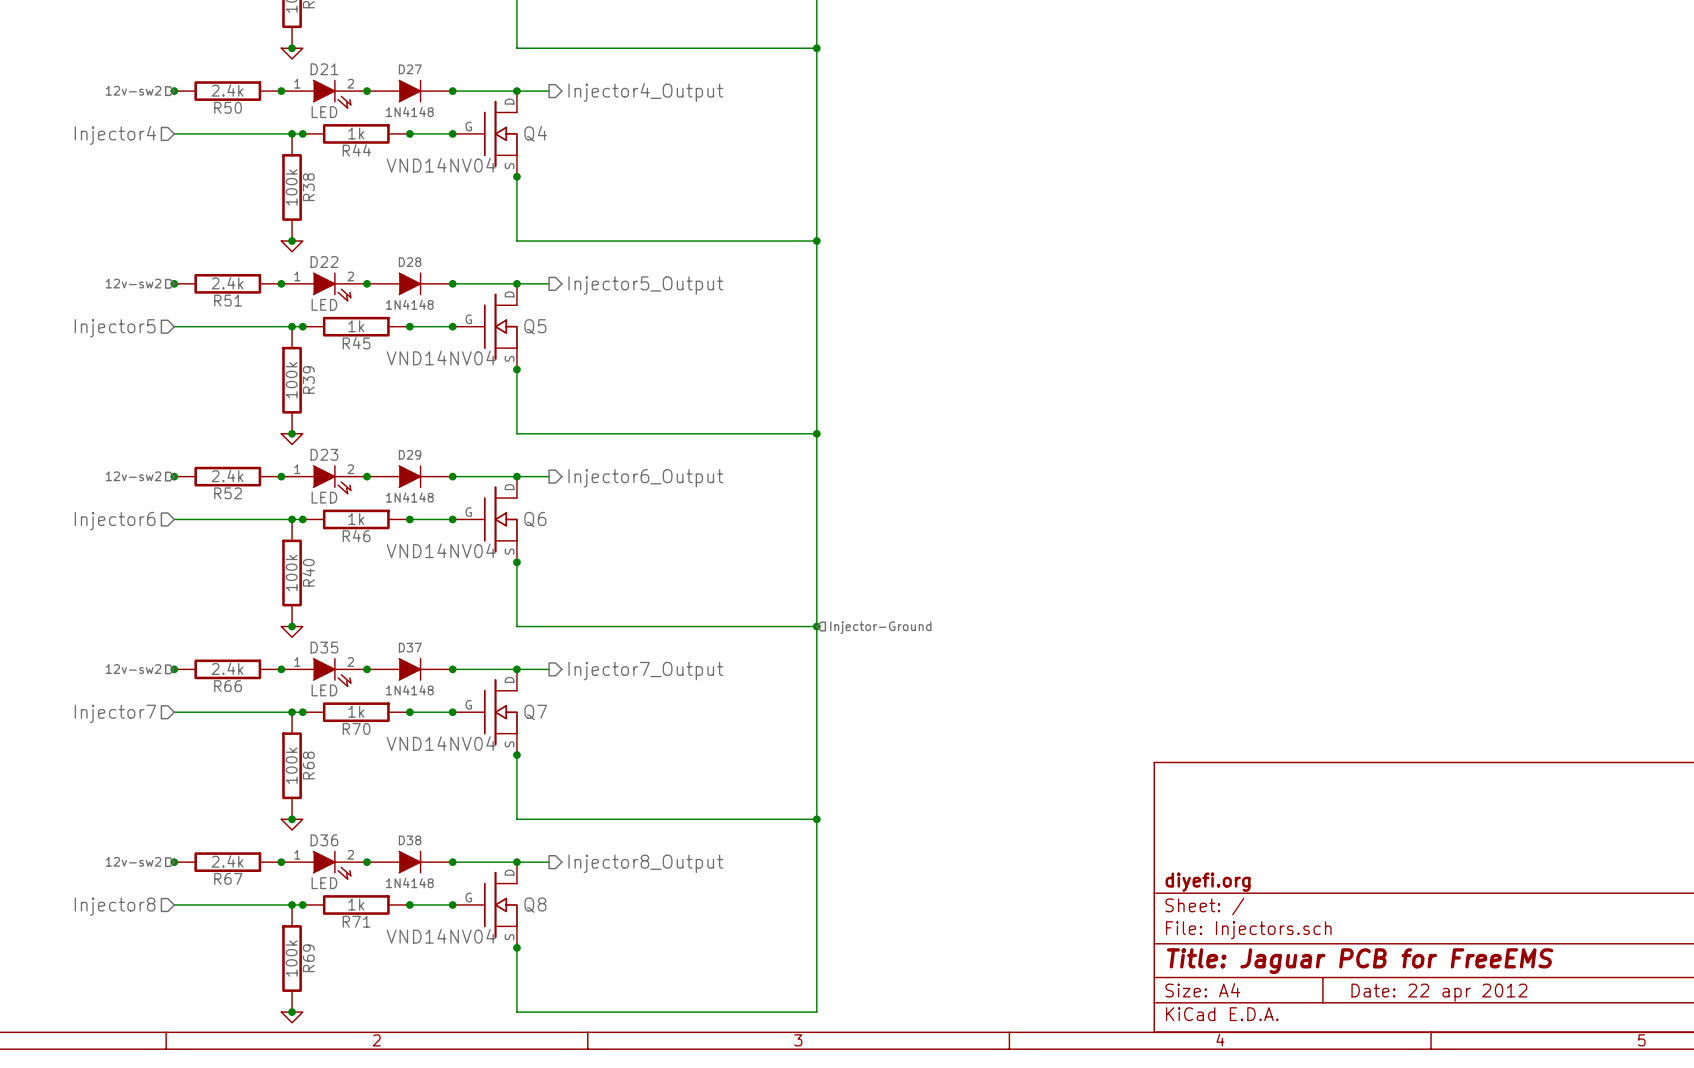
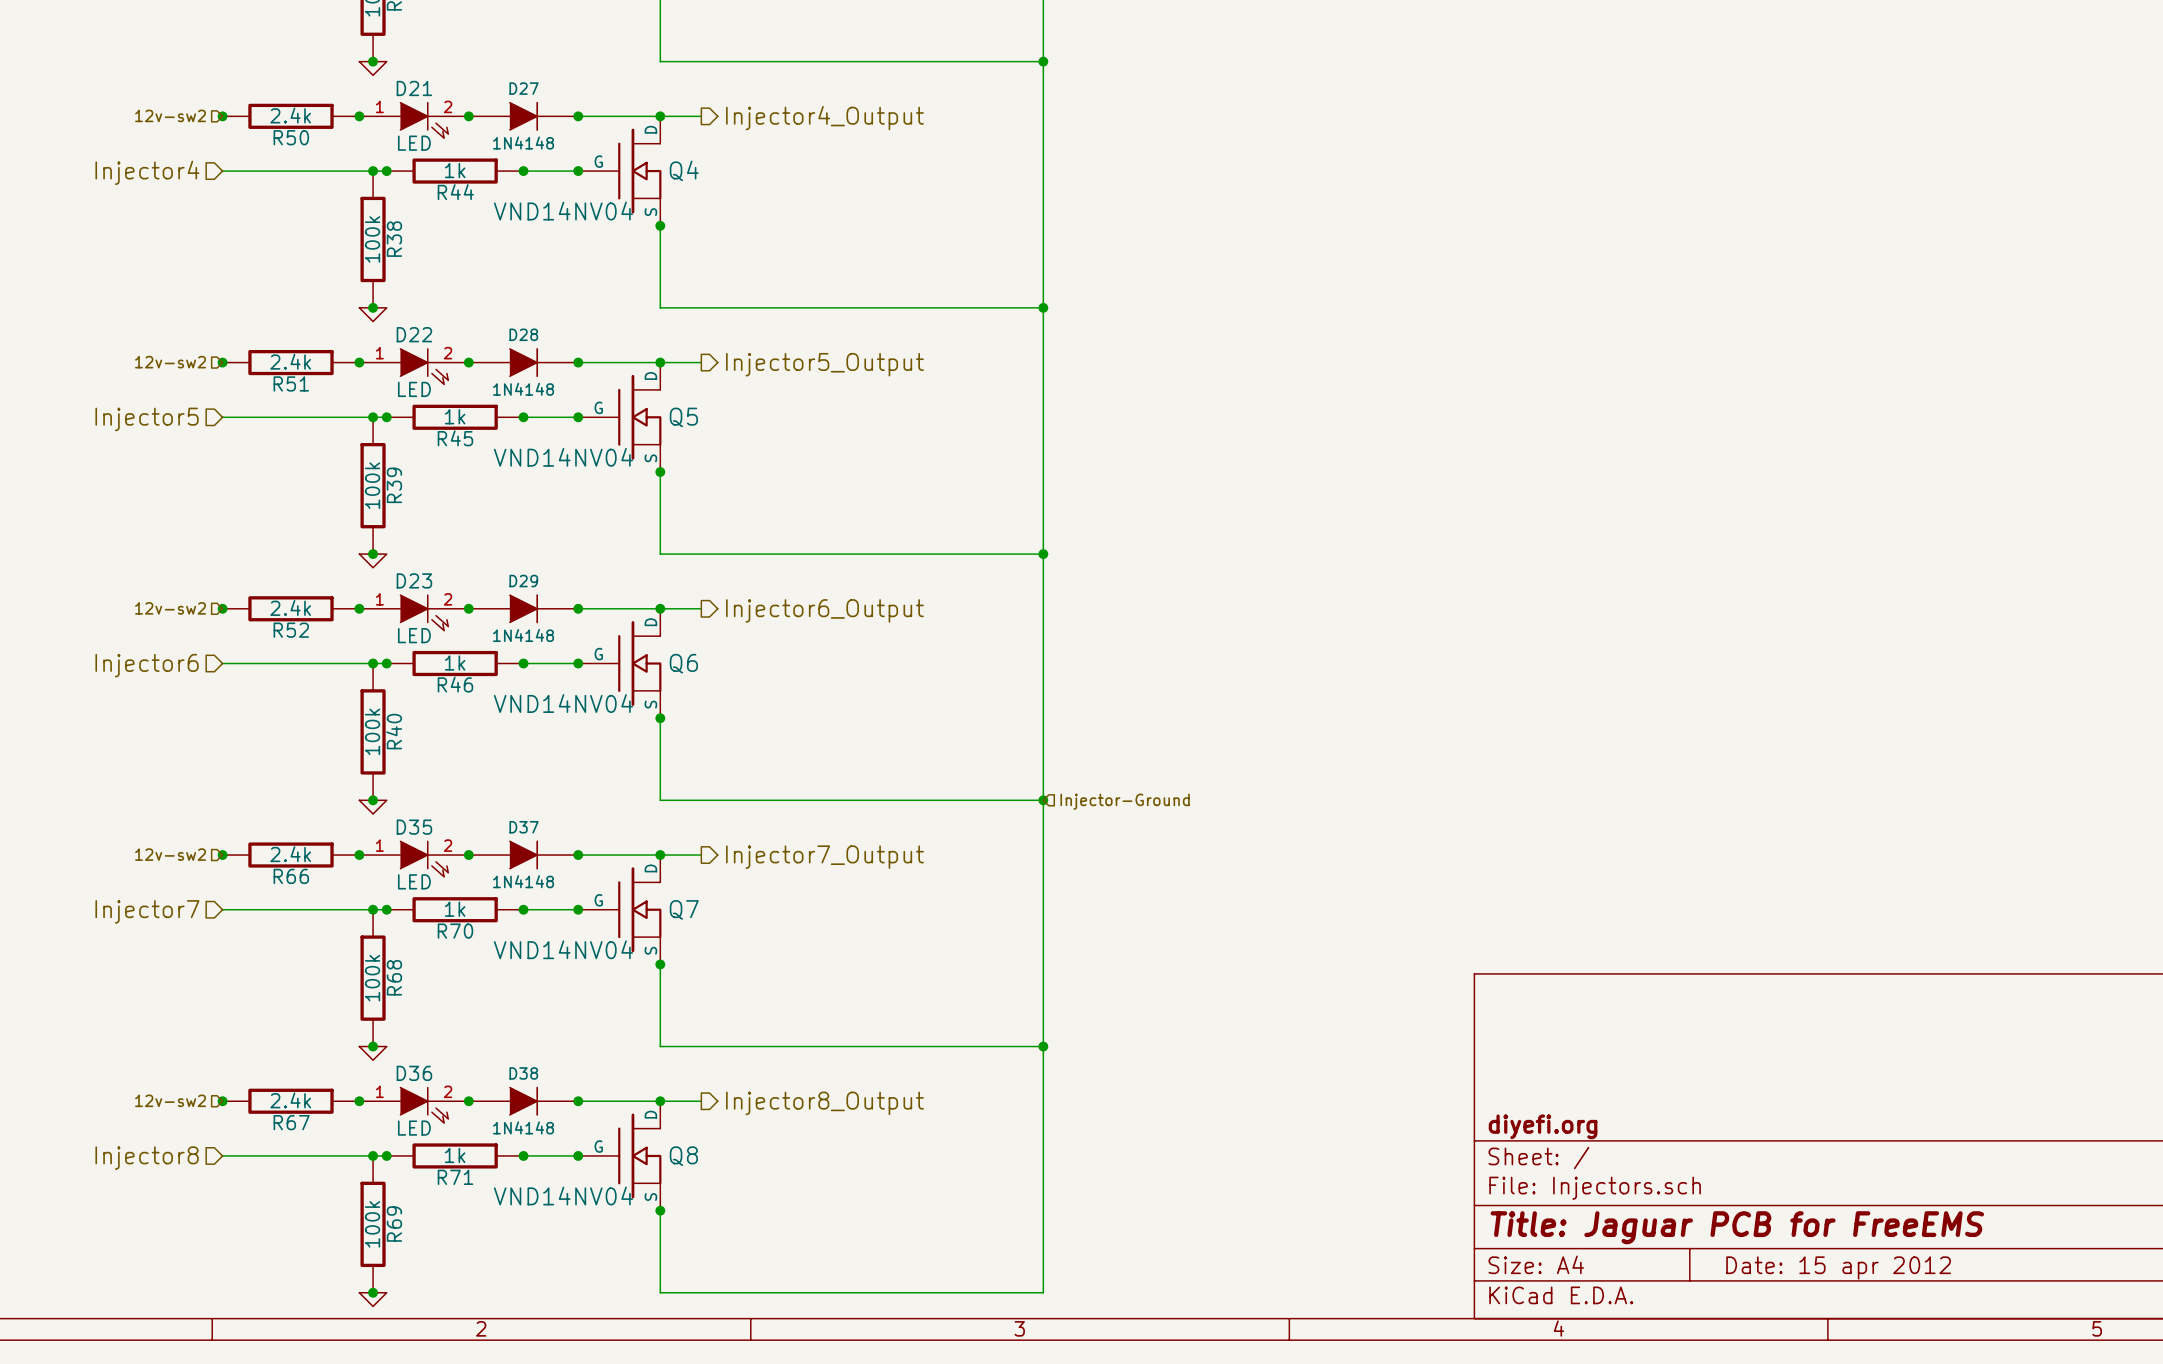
title block: Date: 22 apr 2012 (1439, 992) -> Date: 15 apr 2012 (1838, 1267)

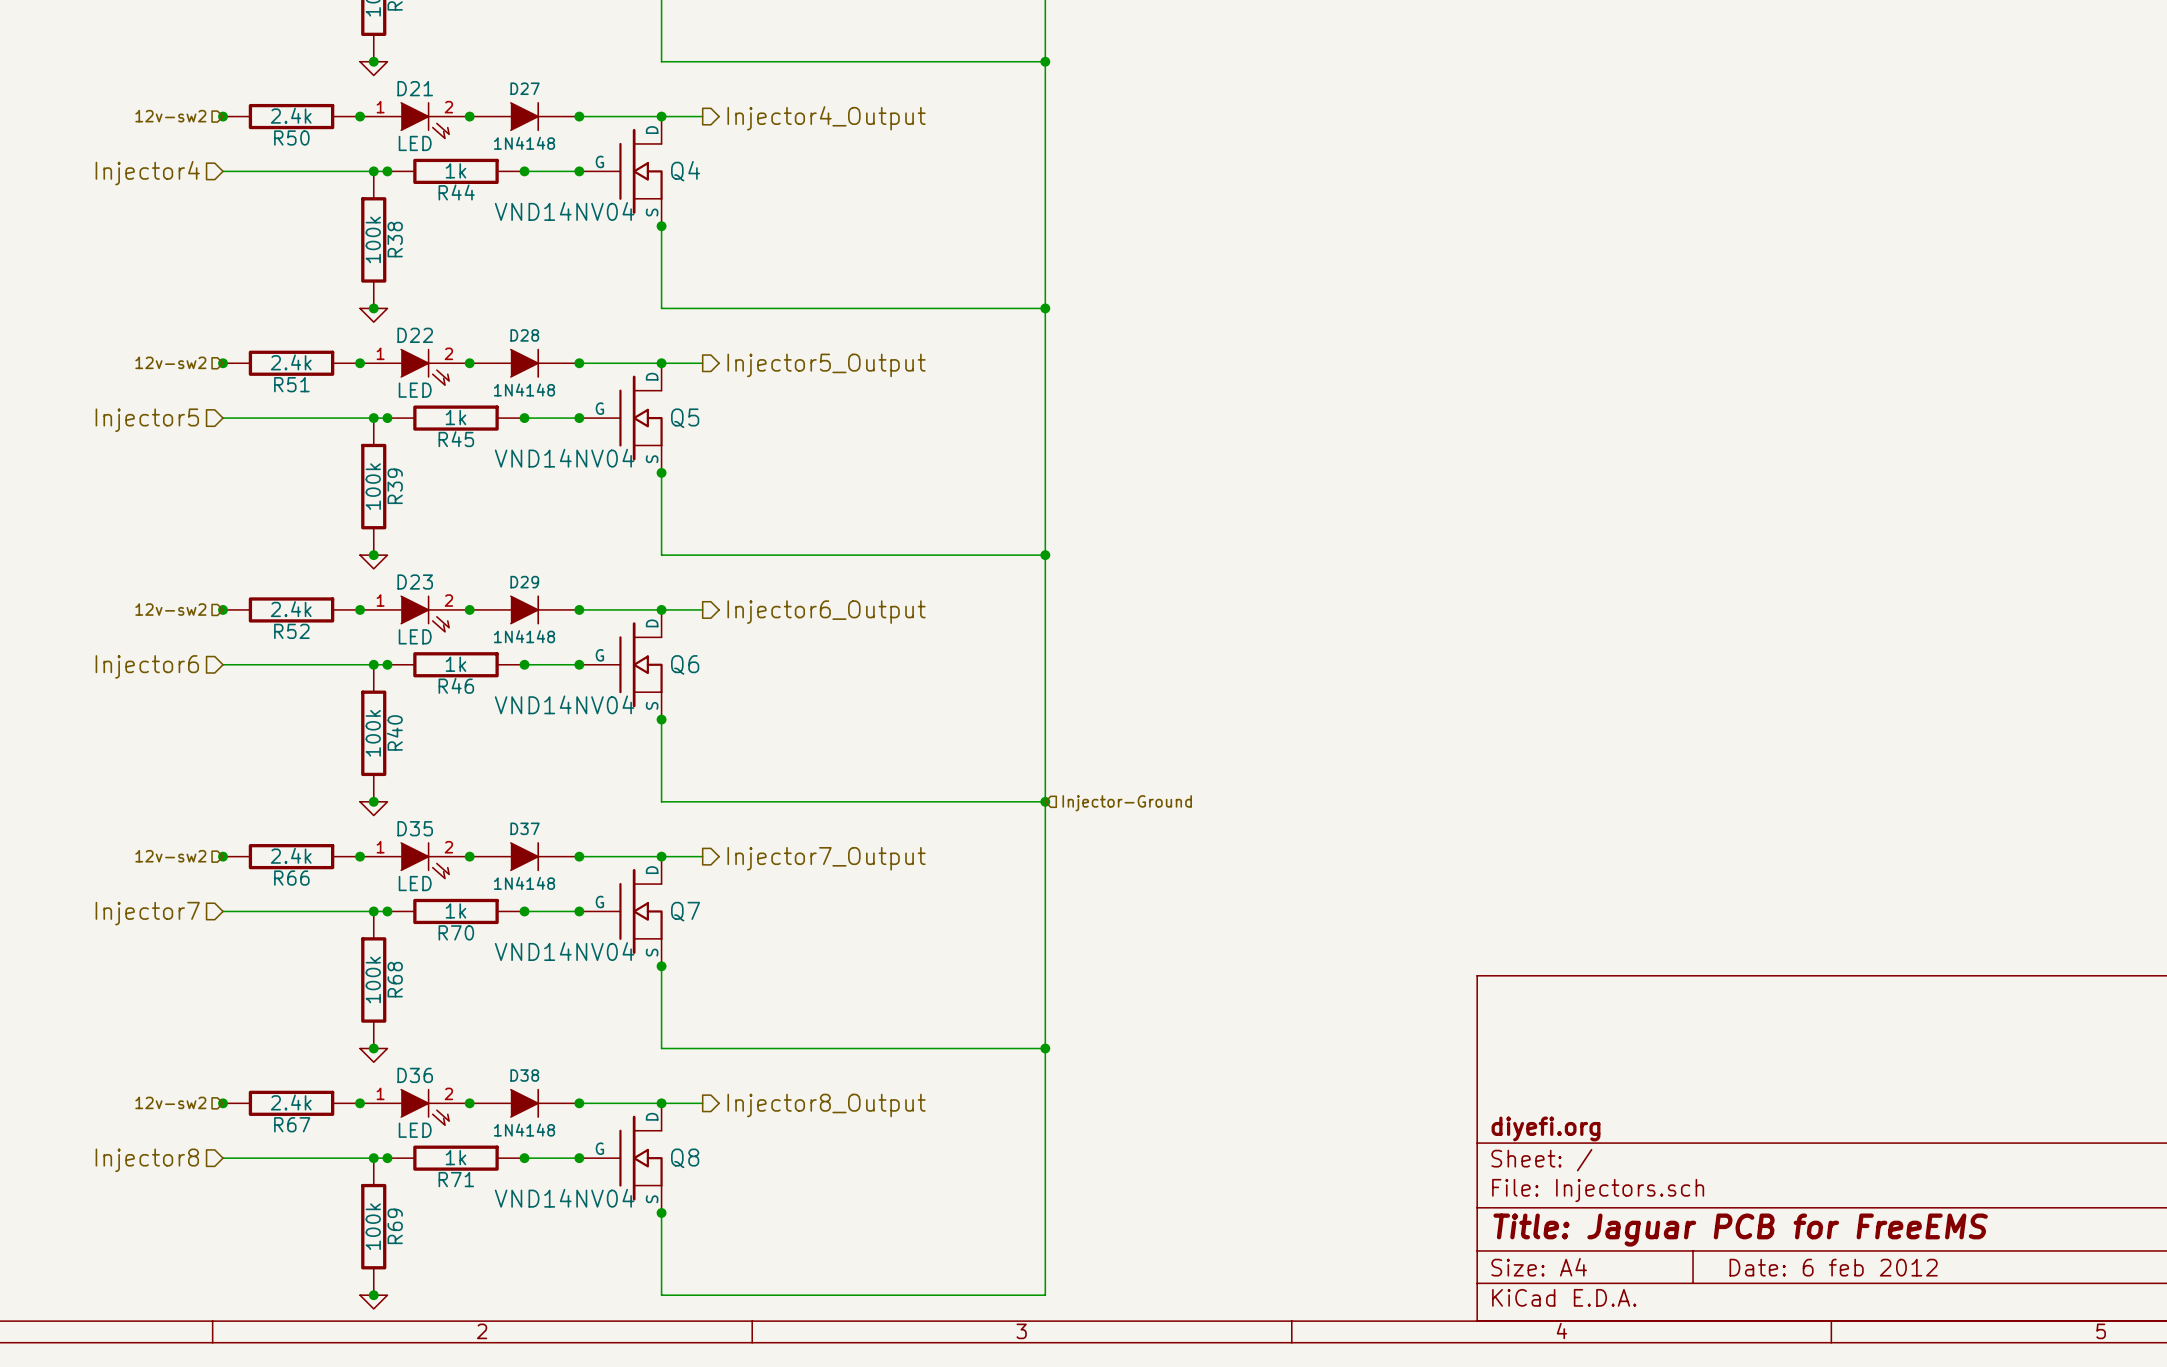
title block: Date: 15 apr 2012 (1838, 1267) -> Date: 6 feb 2012 (1833, 1267)

